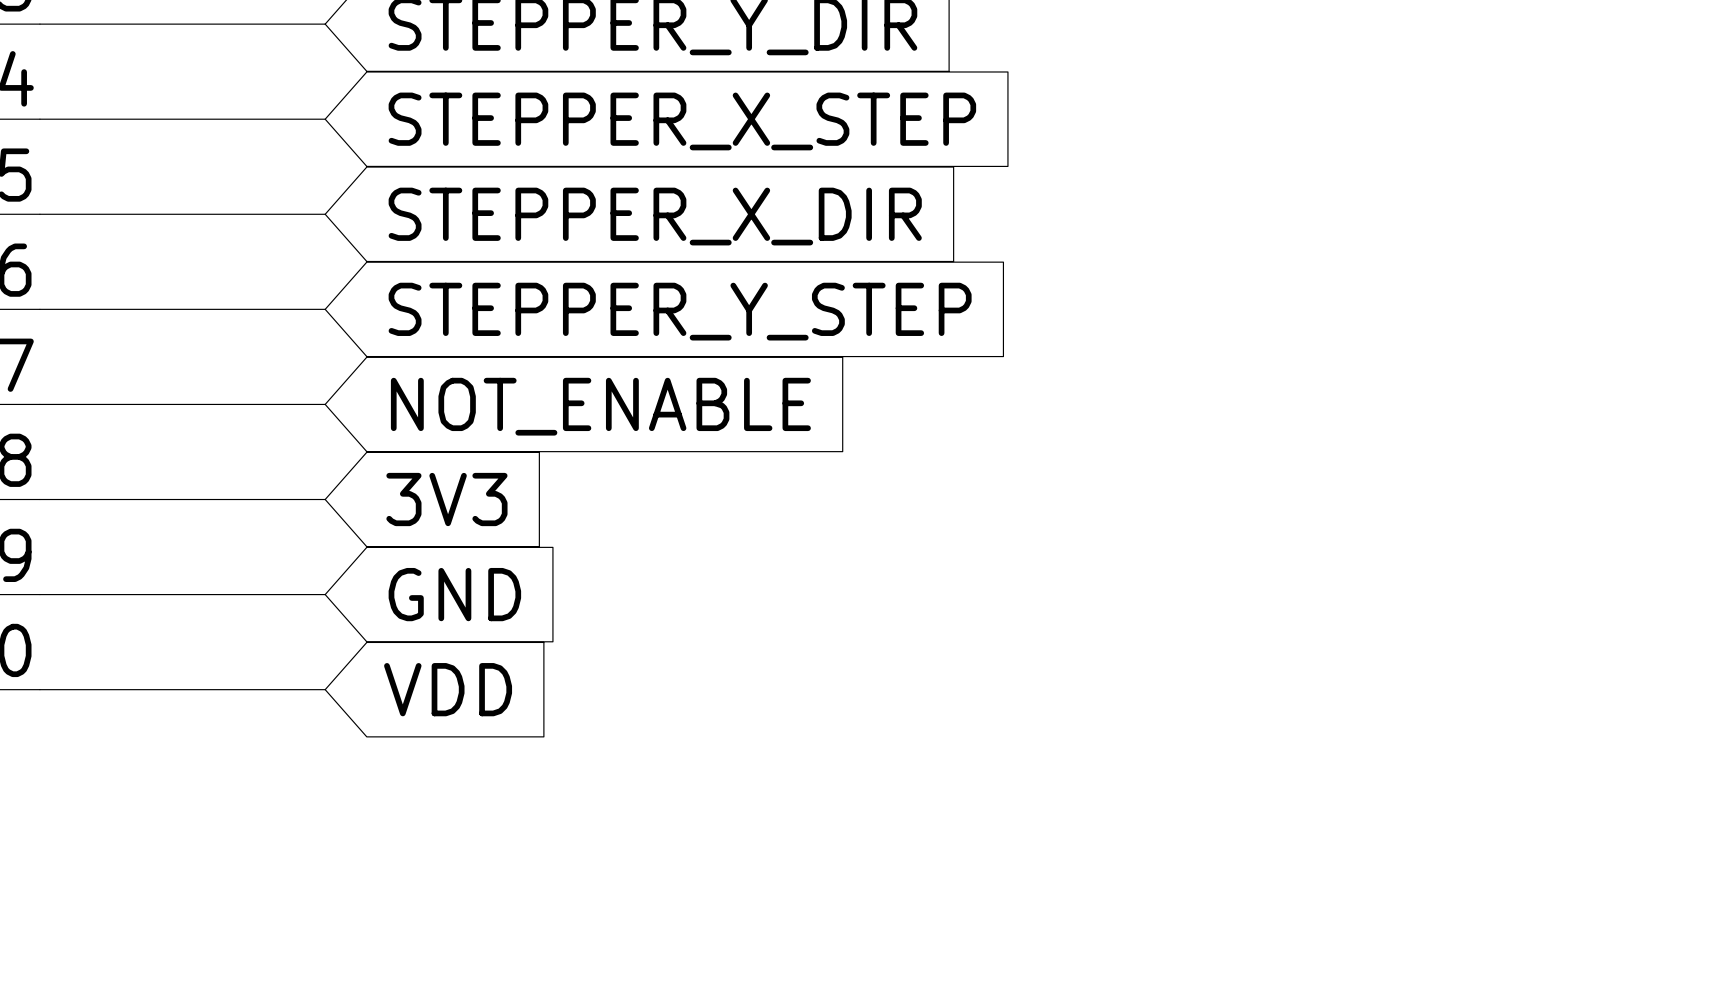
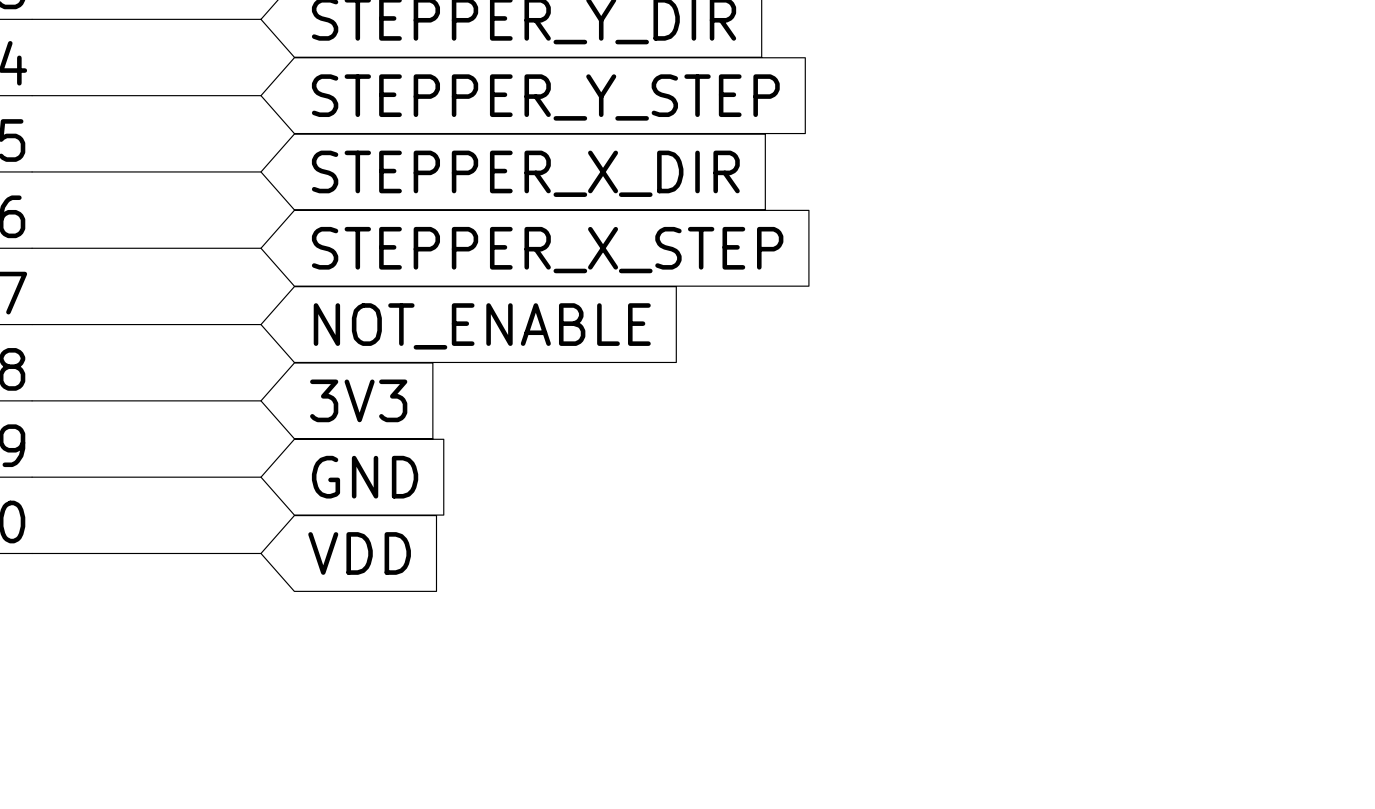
global label: STEPPER_X_STEP (682, 121) -> STEPPER_Y_STEP (545, 97)
global label: STEPPER_Y_STEP (680, 311) -> STEPPER_X_STEP (547, 250)

